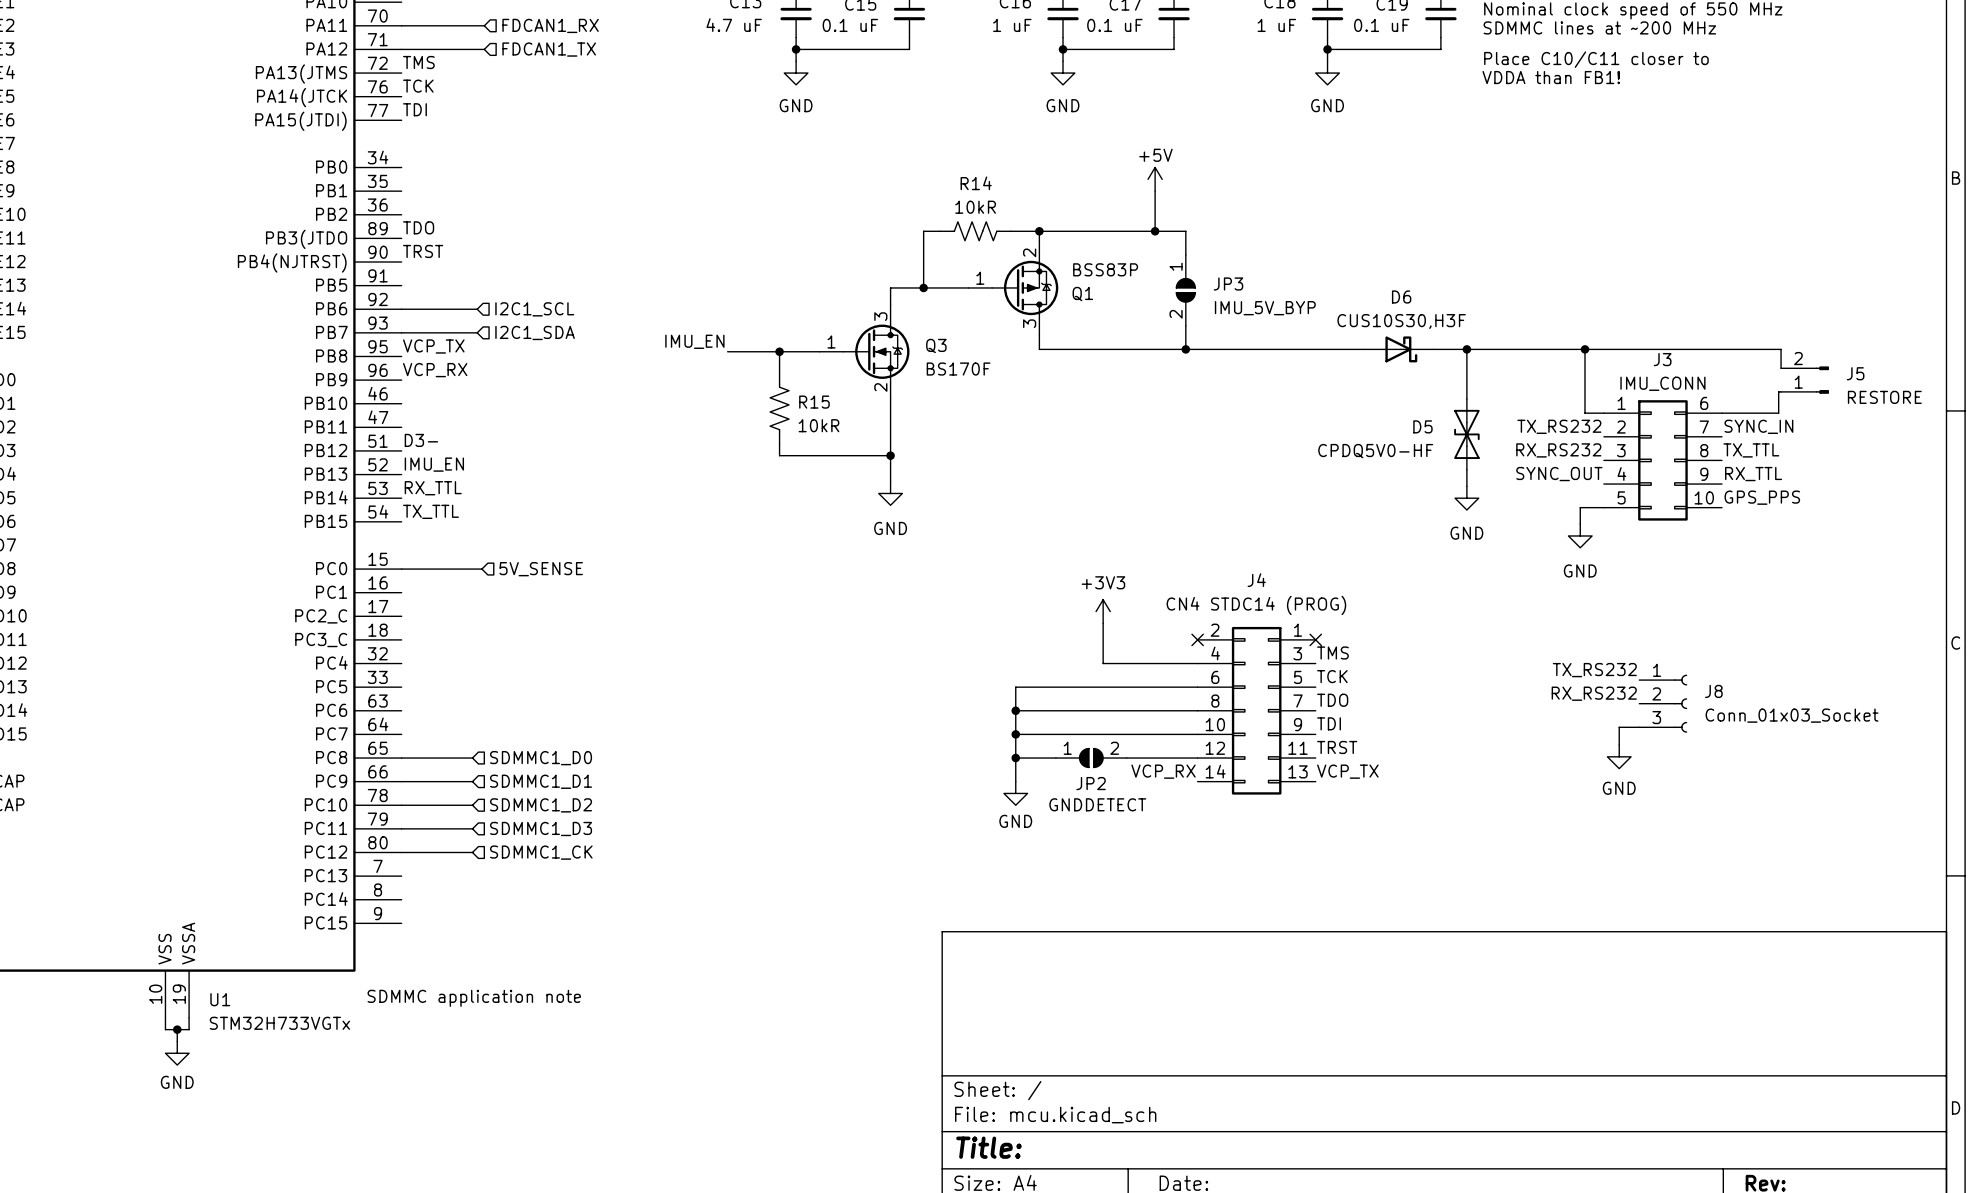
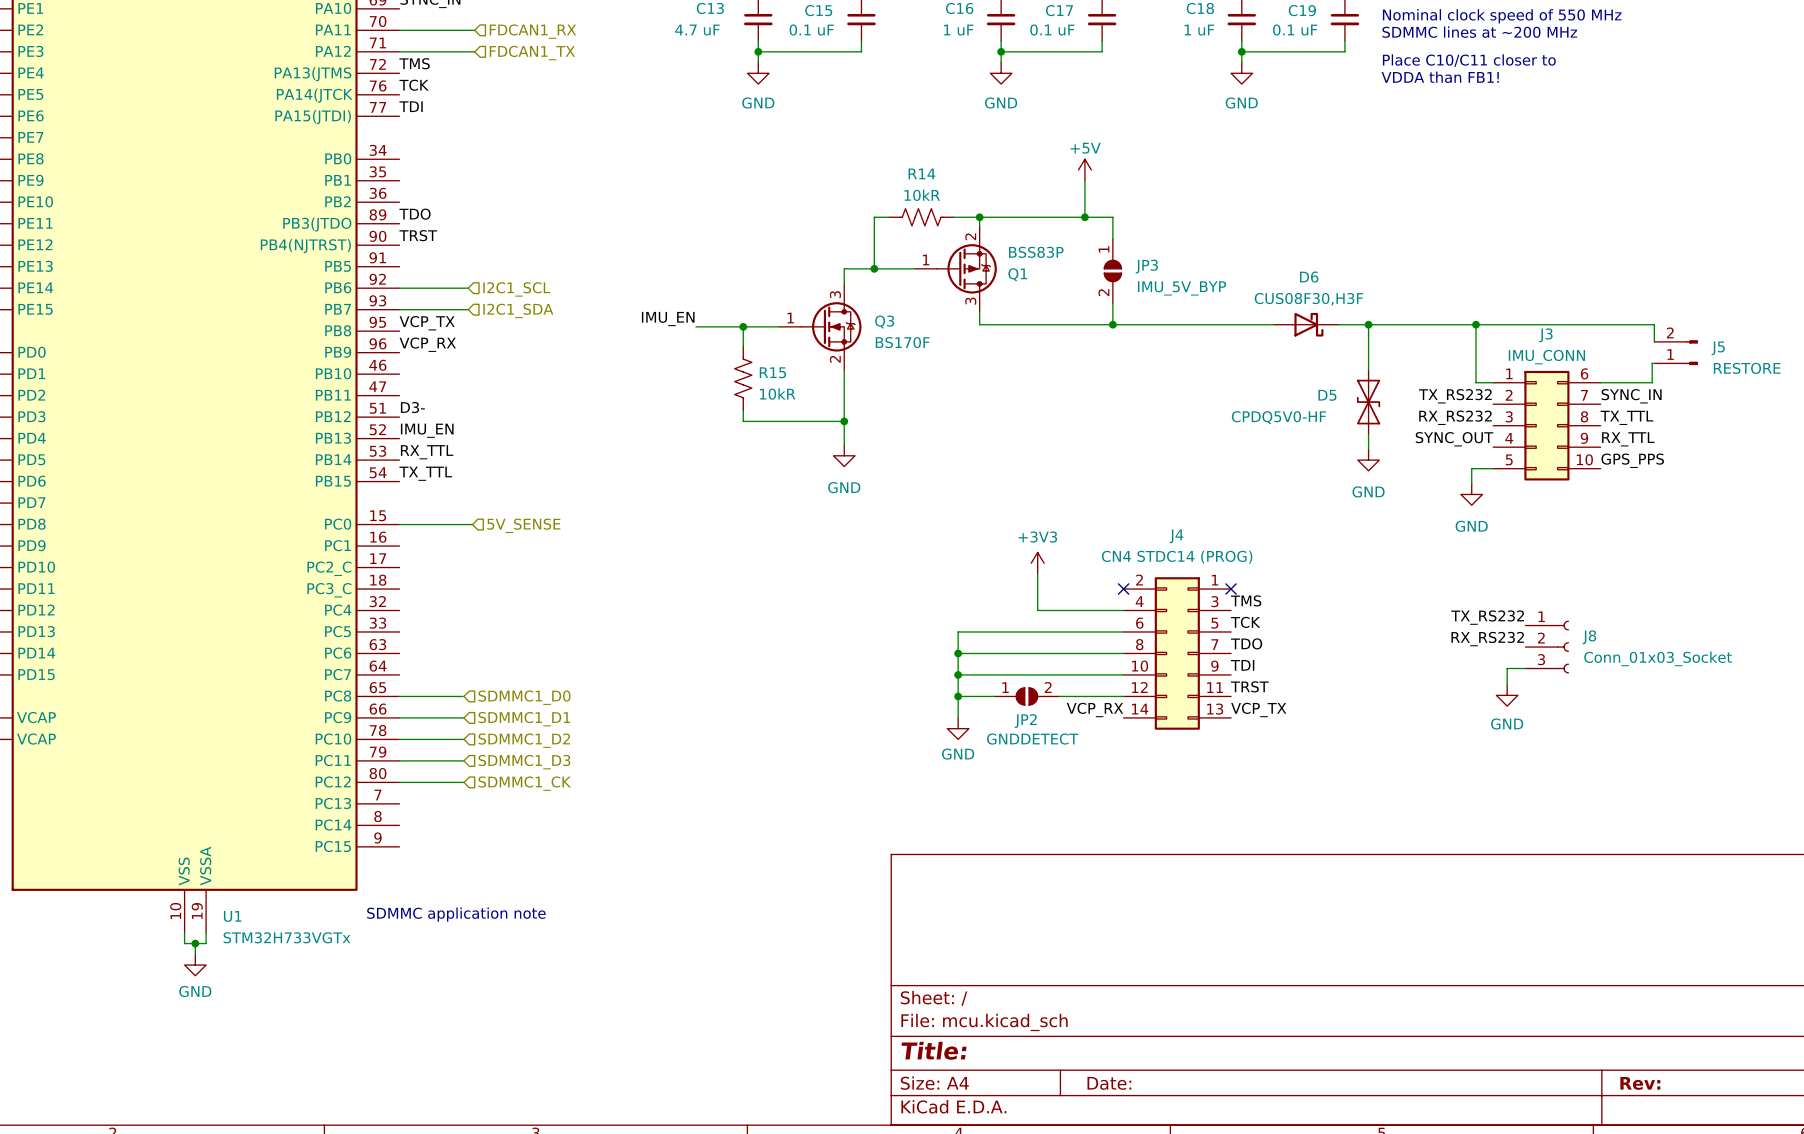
D6 value: CUS10S30,H3F (1401, 321) -> CUS08F30,H3F (1308, 299)

